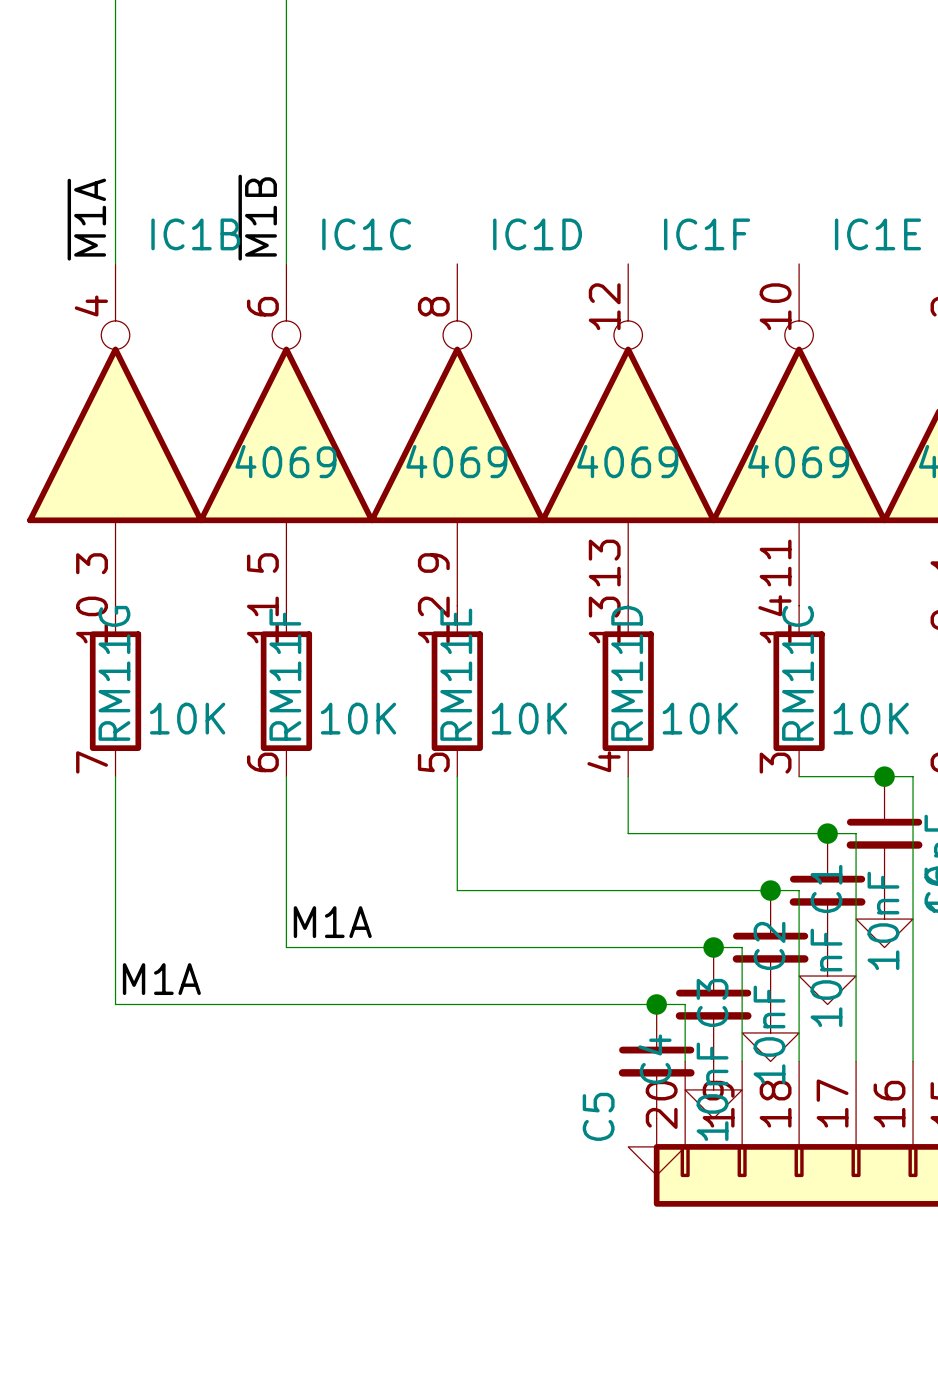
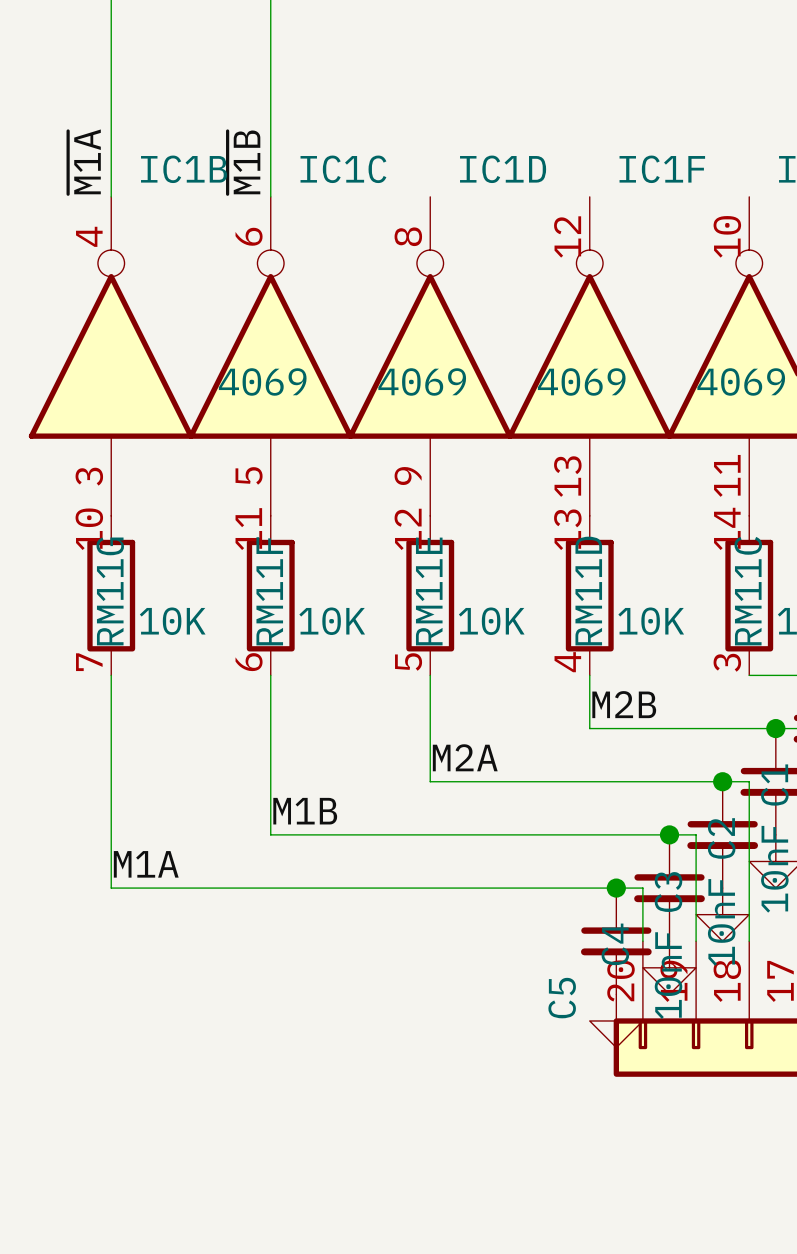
label: none -> M2B (624, 704)
label: none -> M2A (465, 757)
label: M1A (332, 922) -> M1B (305, 811)

